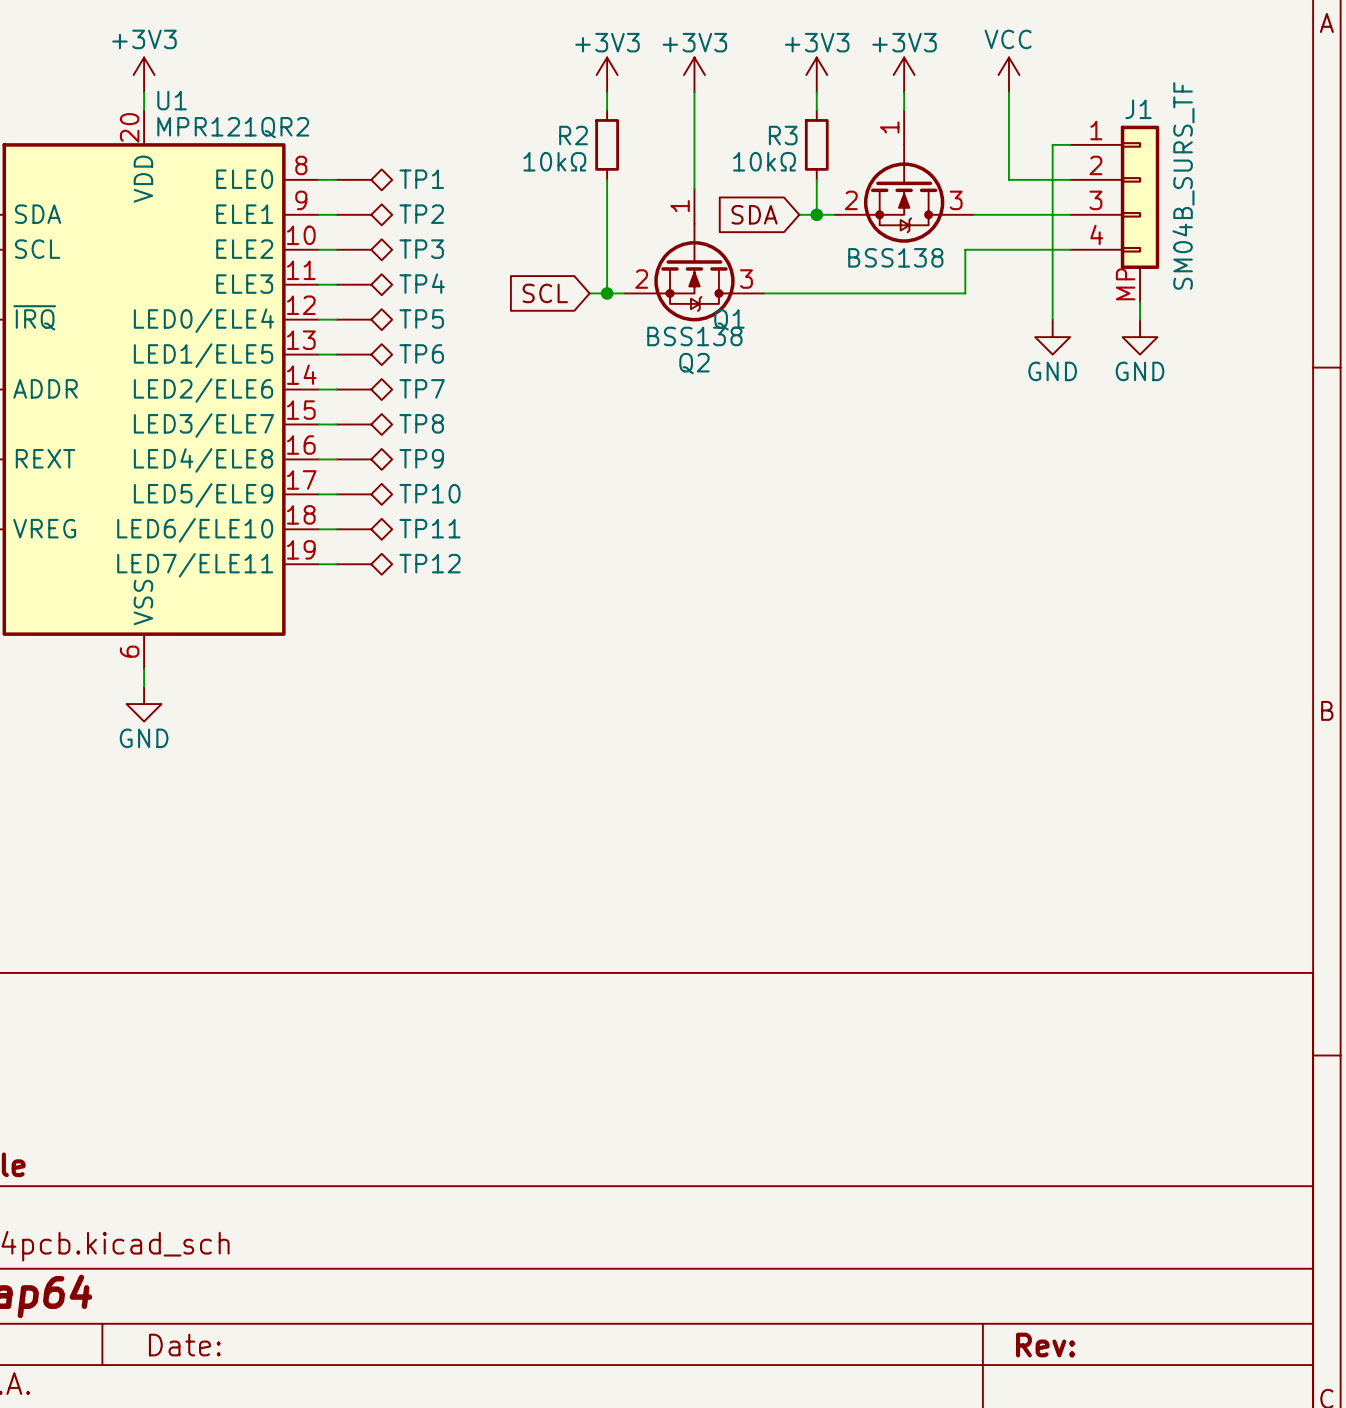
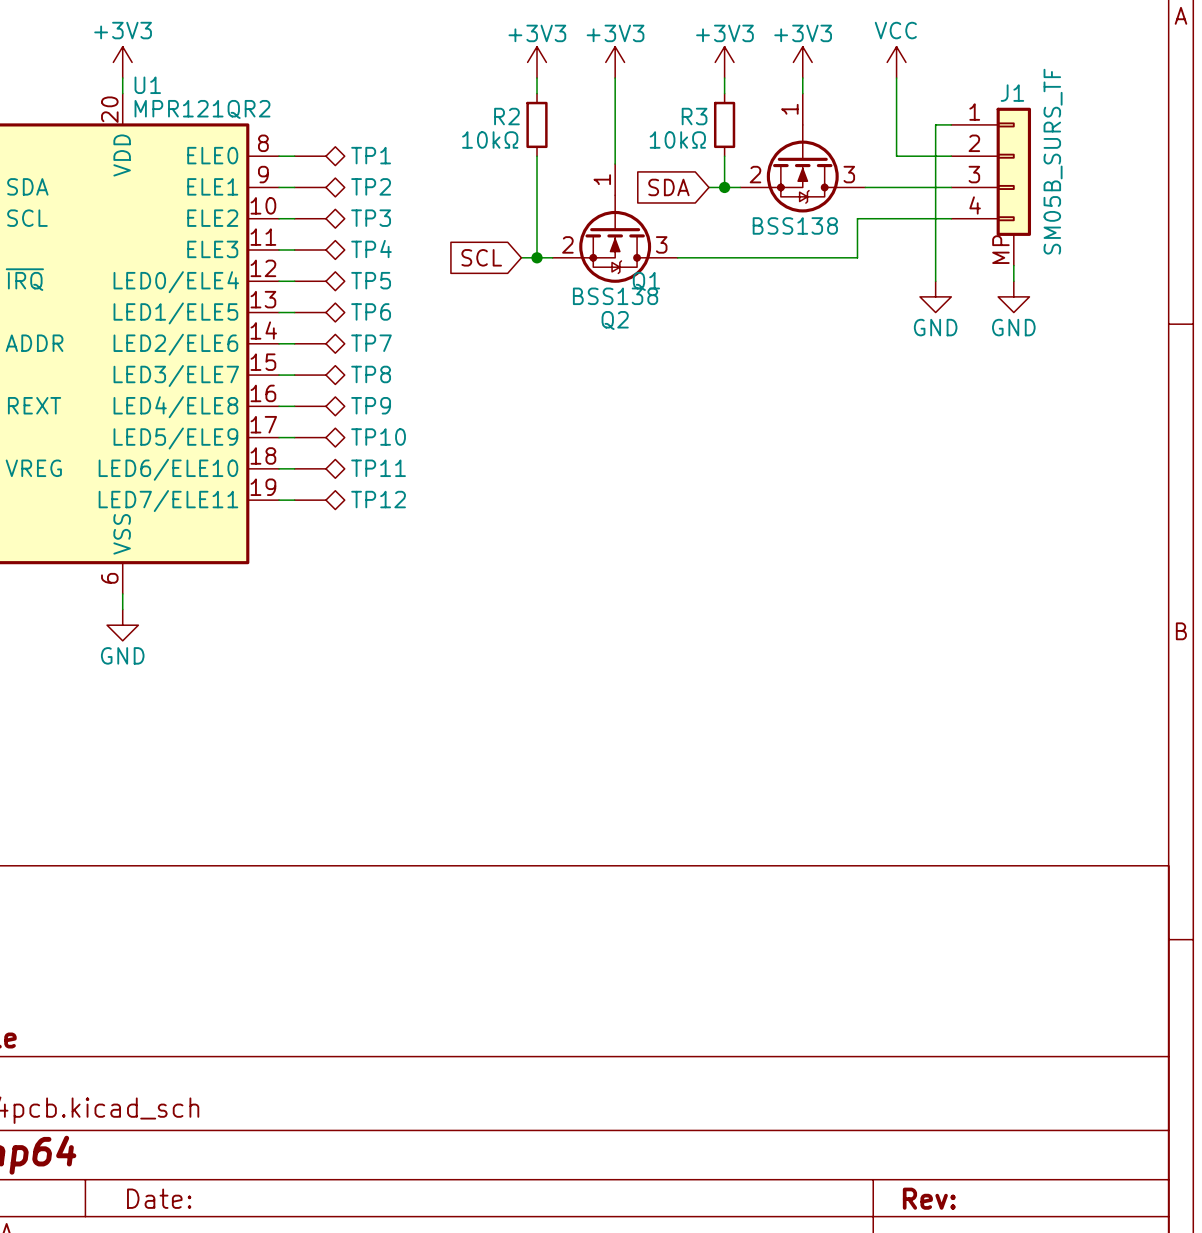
J1 value: SM04B_SURS_TF (1183, 185) -> SM05B_SURS_TF (1053, 161)

